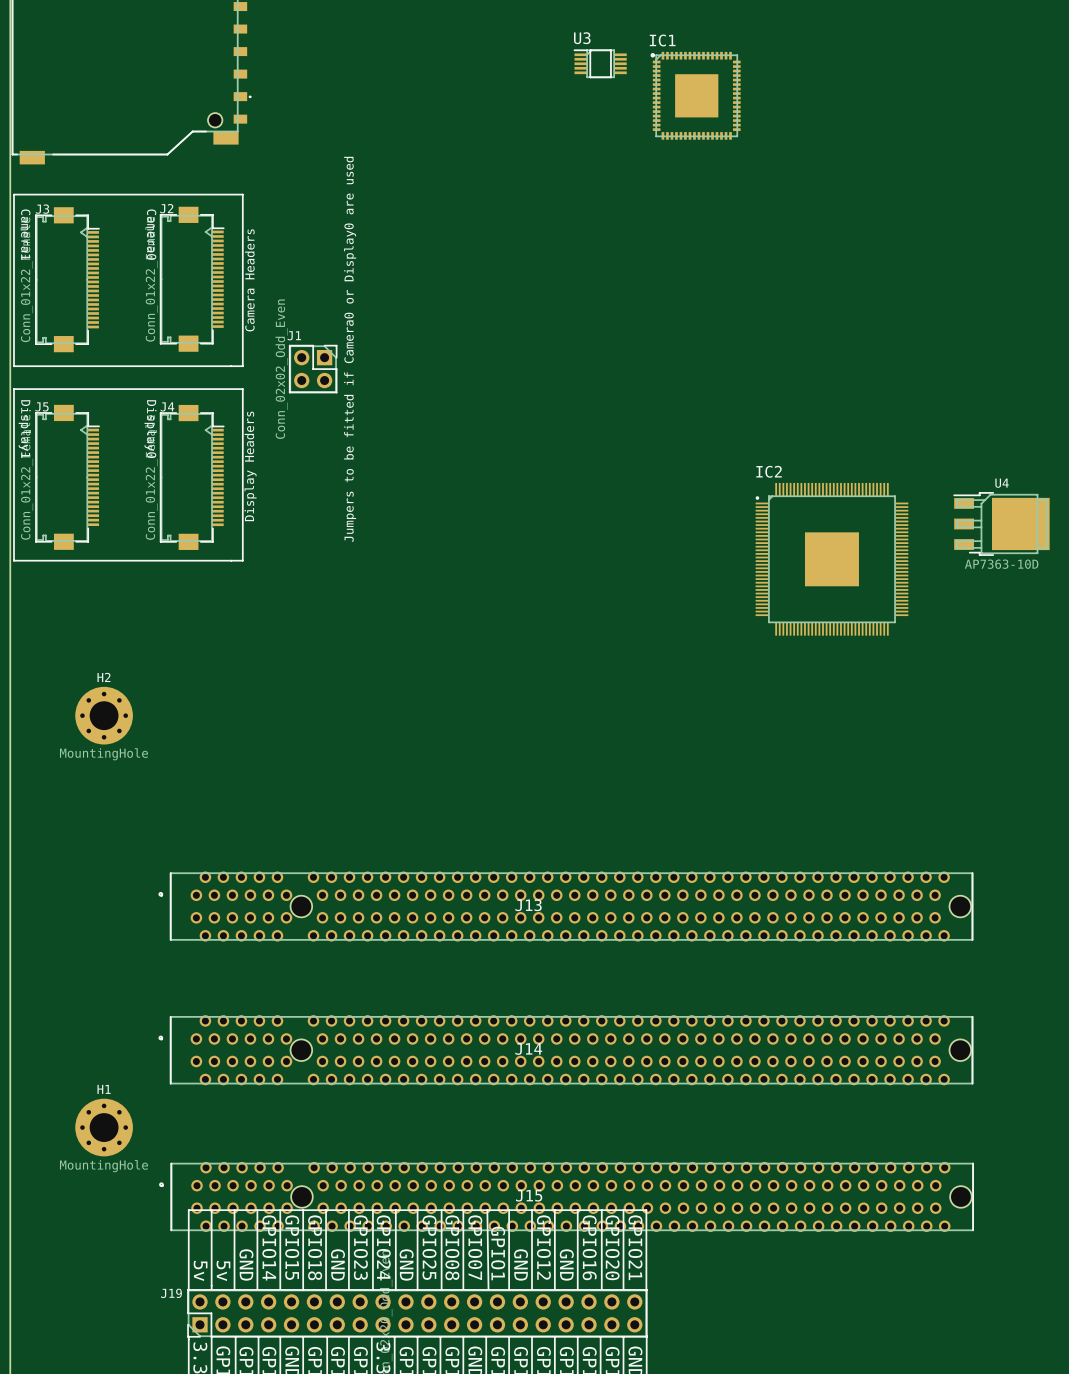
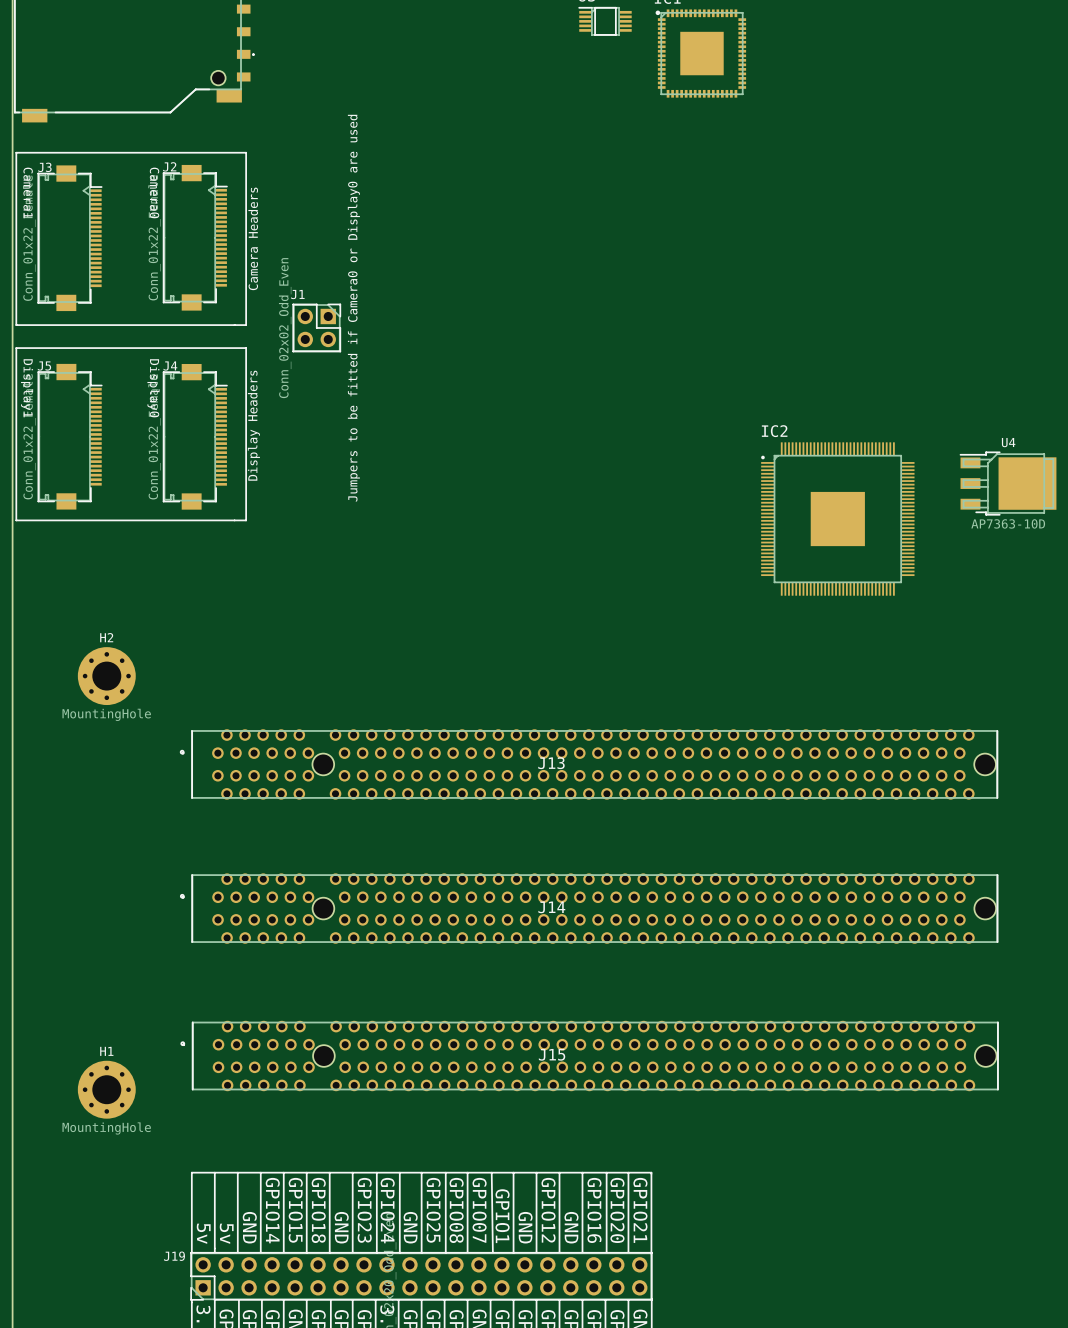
J13 position: (565, 906) -> (589, 764)
J14 position: (565, 1050) -> (589, 908)
J15 position: (566, 1196) -> (589, 1056)

